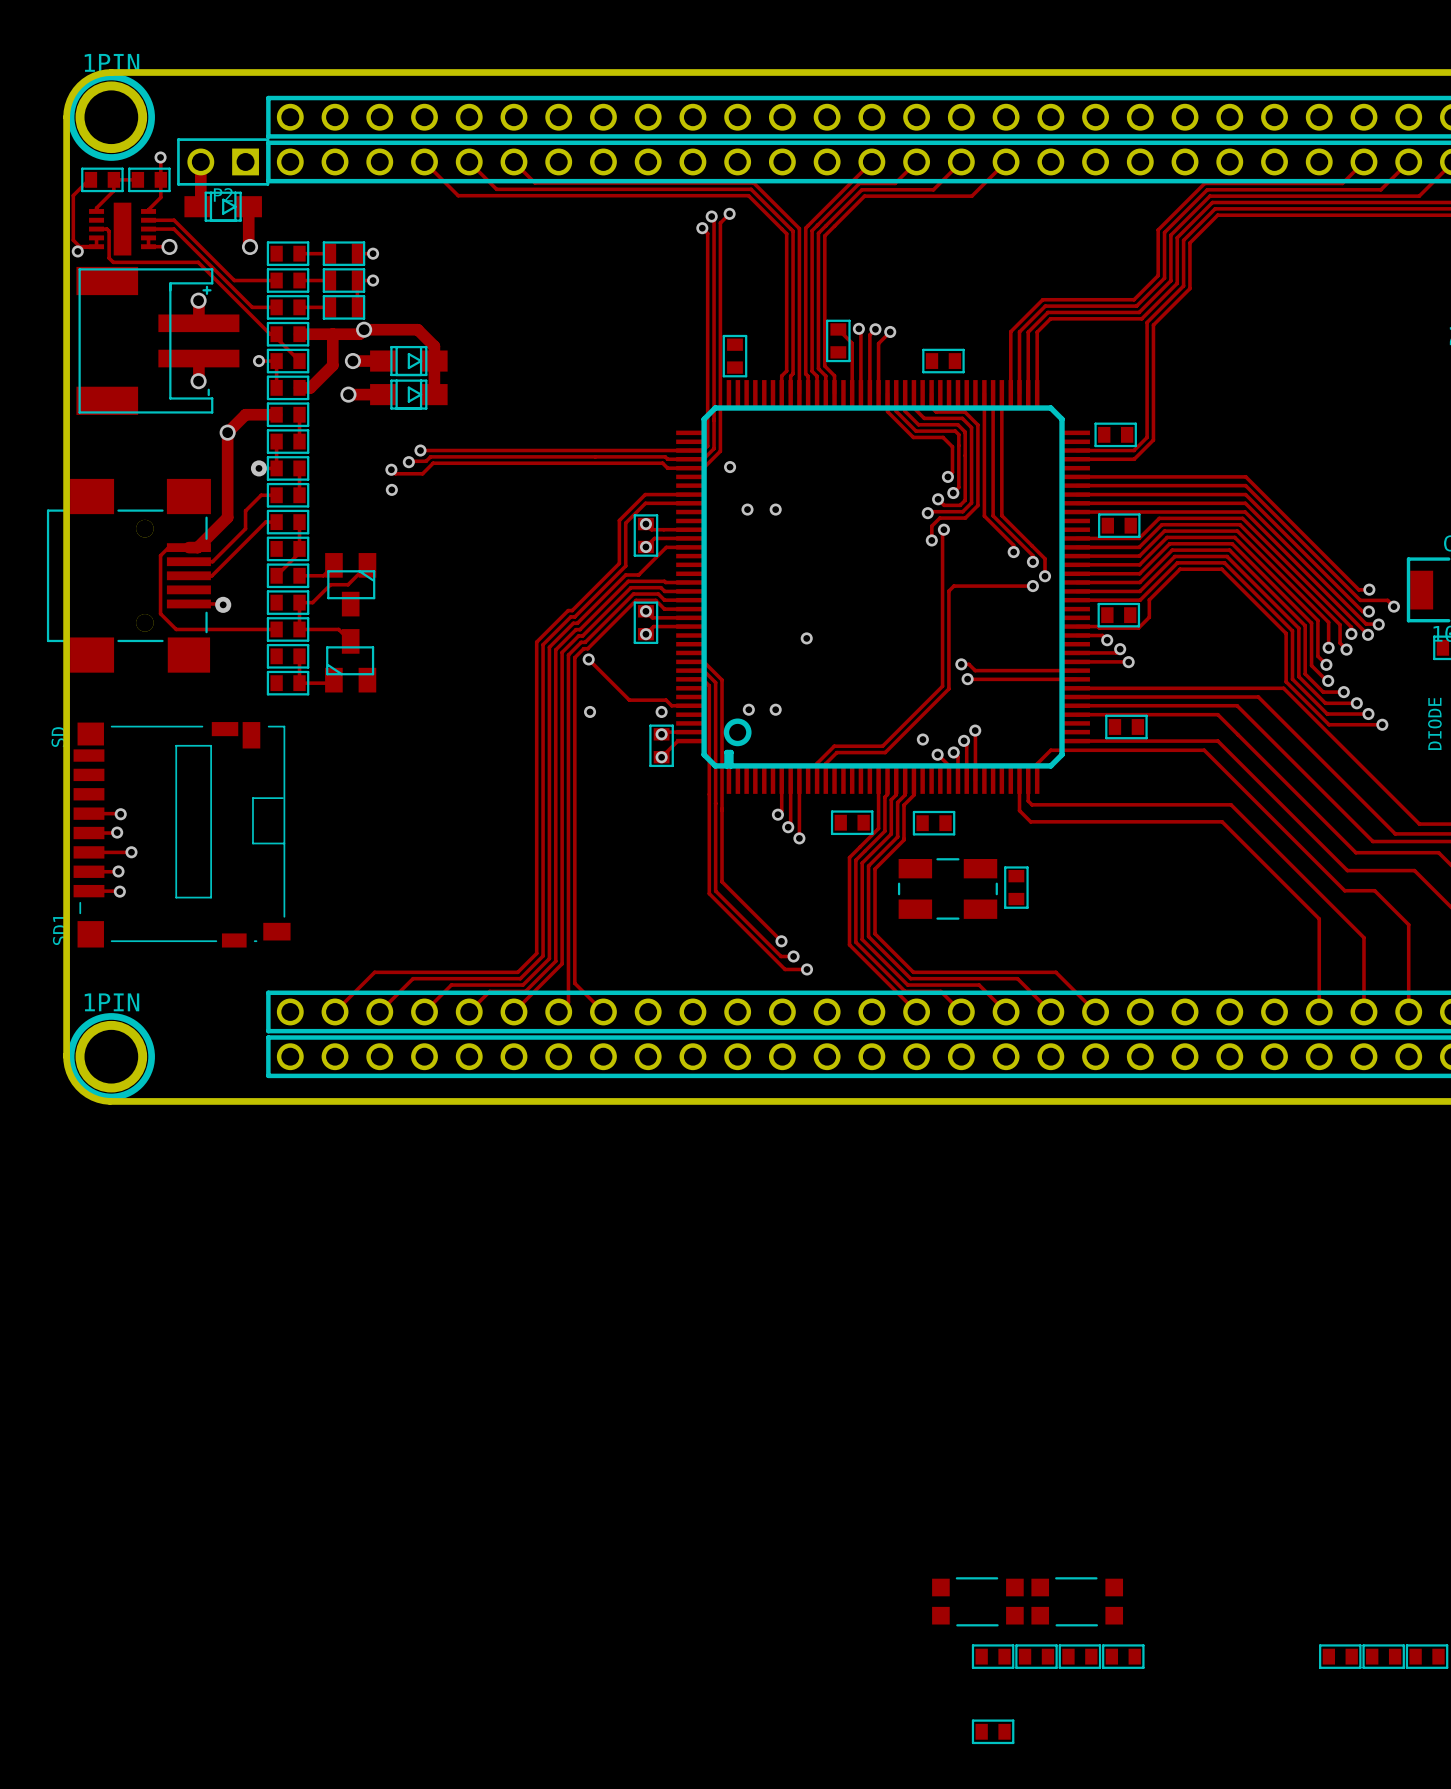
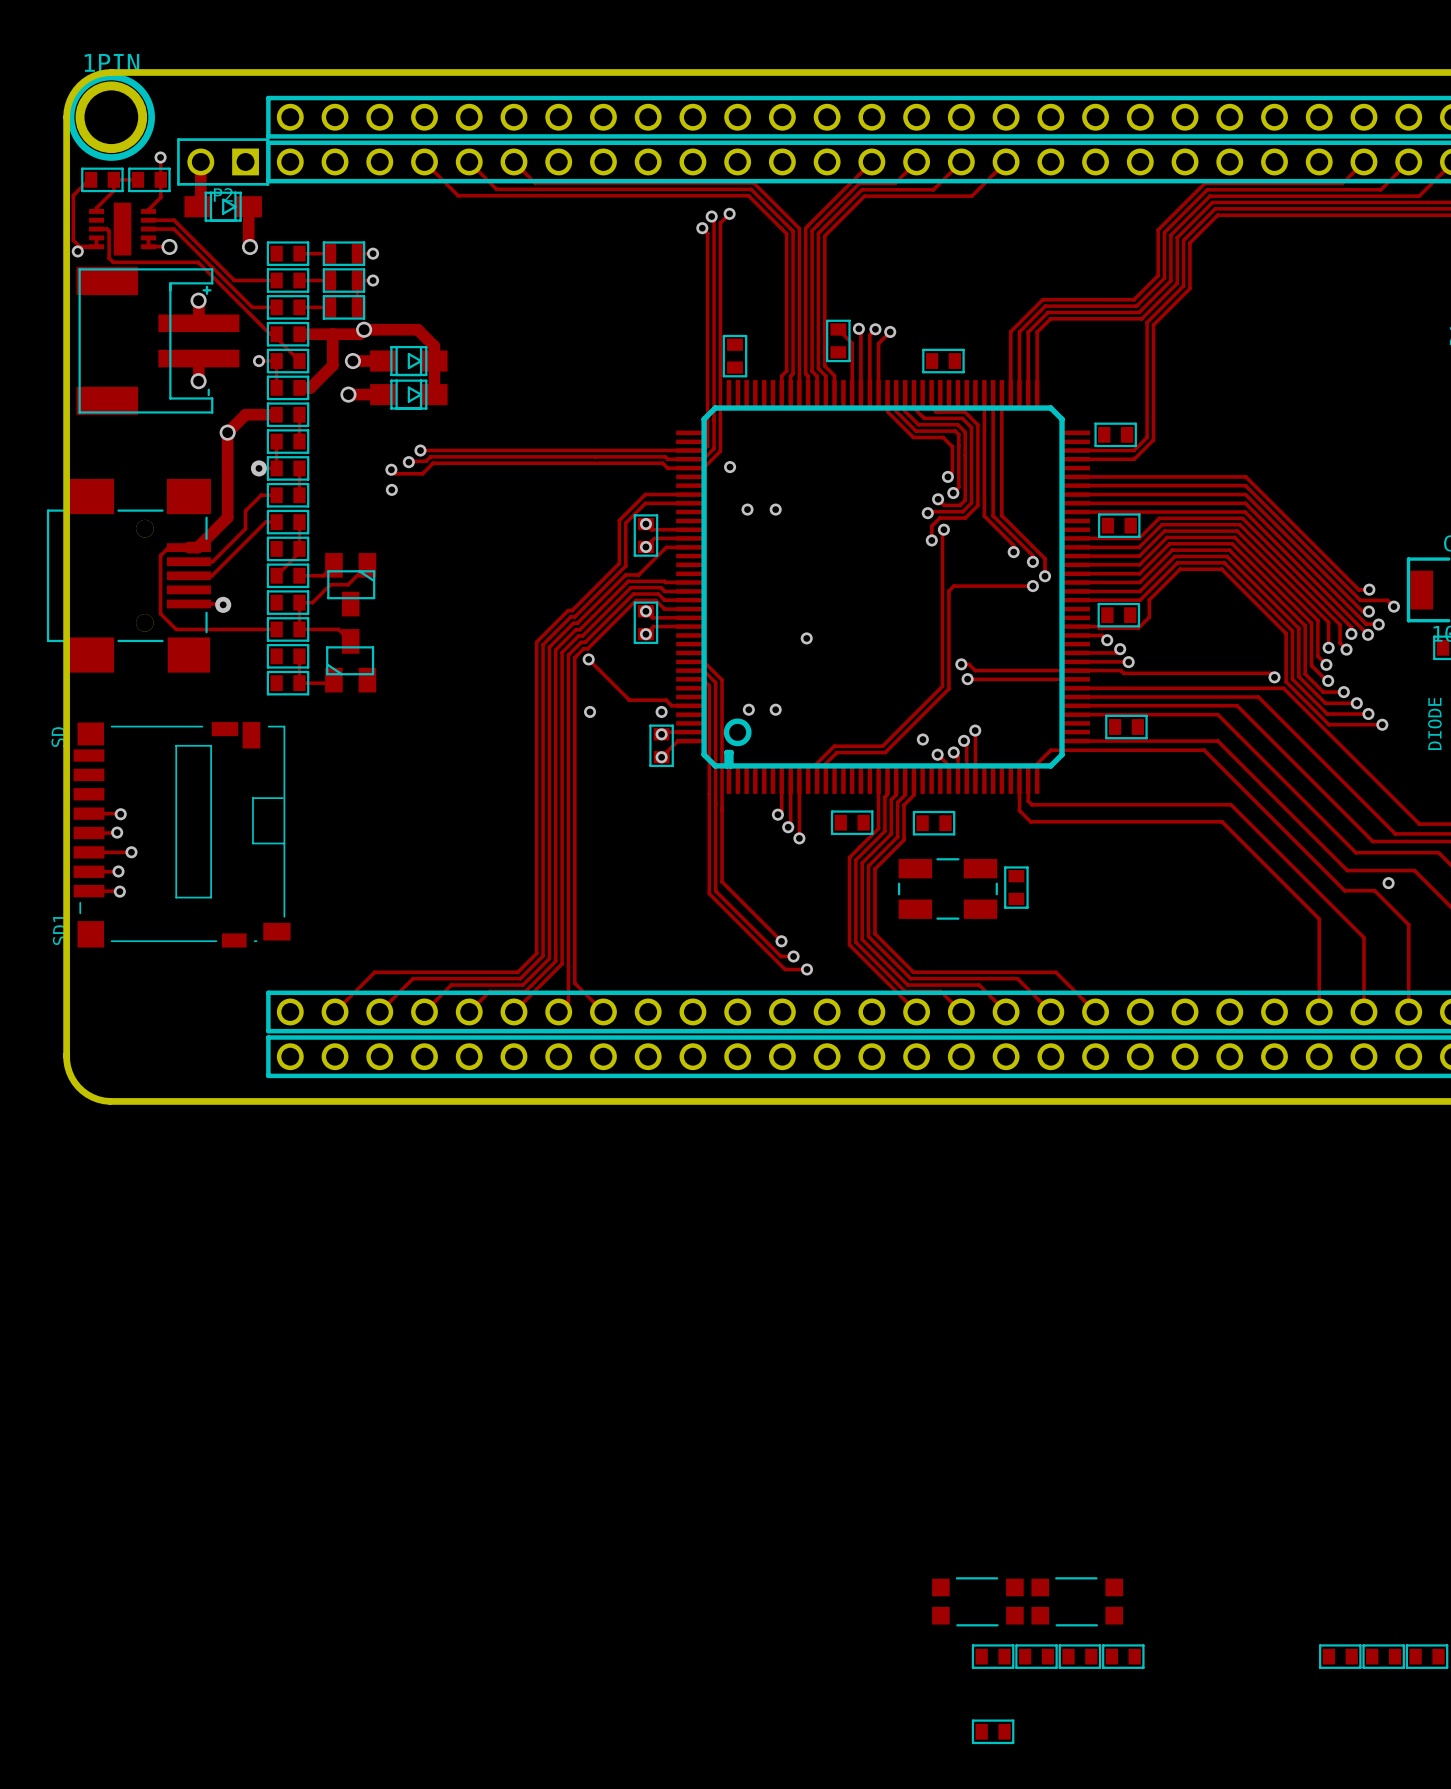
track: none -> (1076, 670) (1121, 670) (1123, 673) (1270, 673) (1274, 677)
via: none -> (1274, 677)
via: none -> (1388, 883)
1PIN: (111, 1056) -> none

